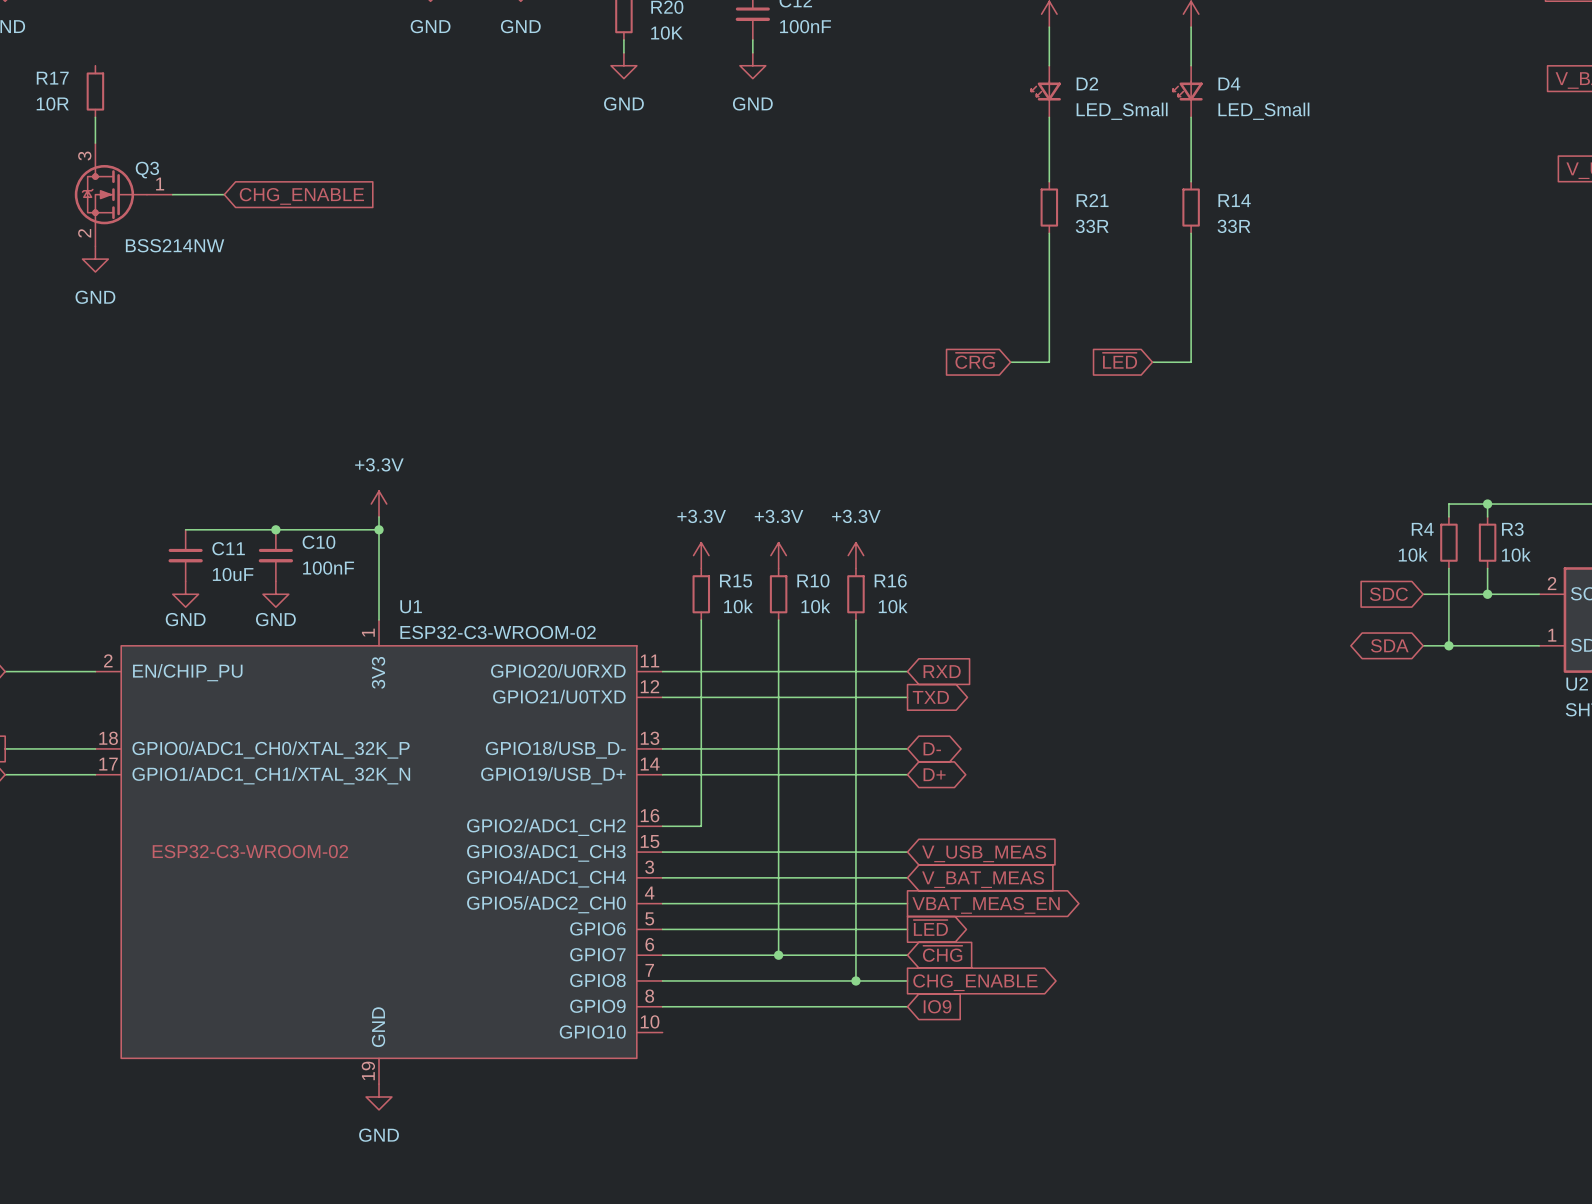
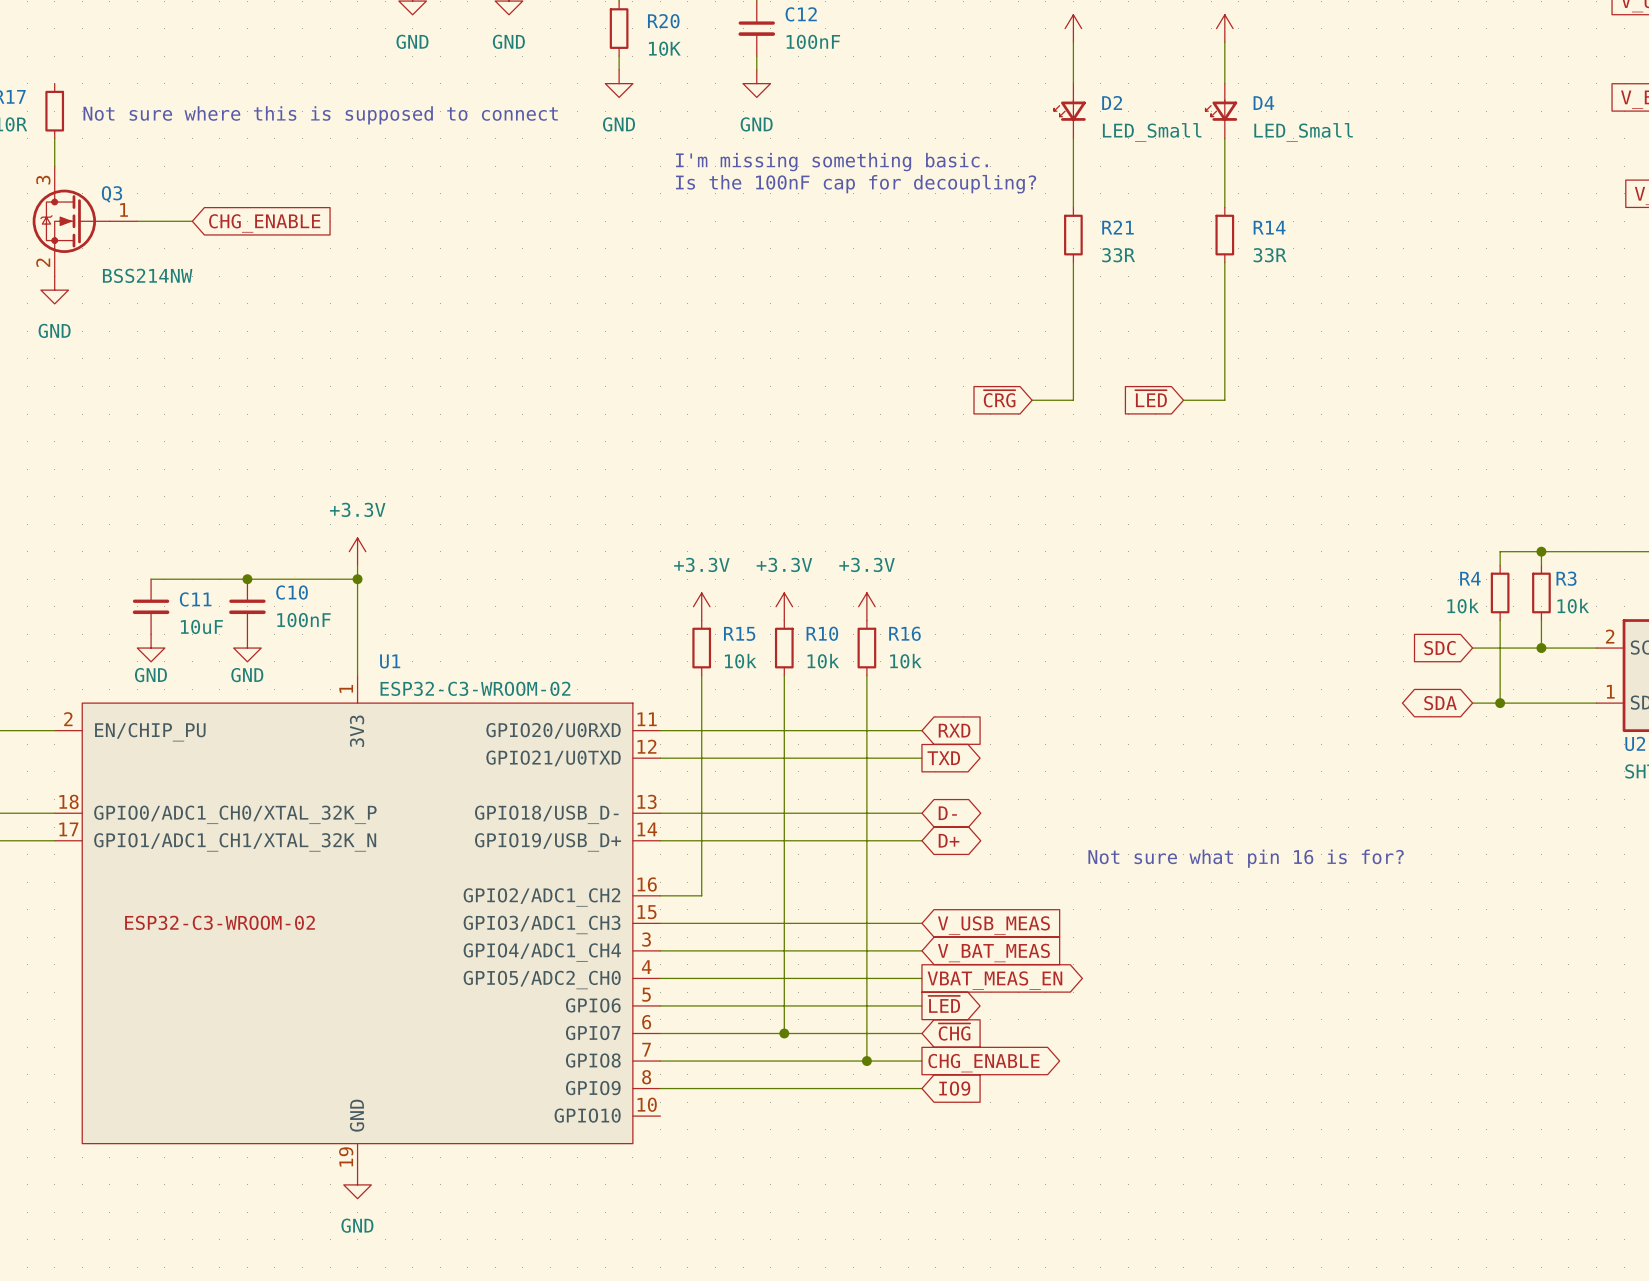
text: none -> Not sure where this is supposed to connect (320, 115)
text: none -> I'm missing something basic. (831, 162)
text: none -> Is the 100nF cap for decoupling? (856, 184)
text: none -> Not sure what pin 16 is for? (1246, 858)

